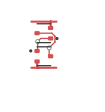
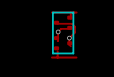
line: none -> (52, 12) (73, 12) (73, 53) (52, 53) (52, 12)
part footprint: [34, 23, 59, 44] -> [53, 15, 73, 30]
part footprint: [29, 46, 54, 67] -> [53, 36, 73, 51]

